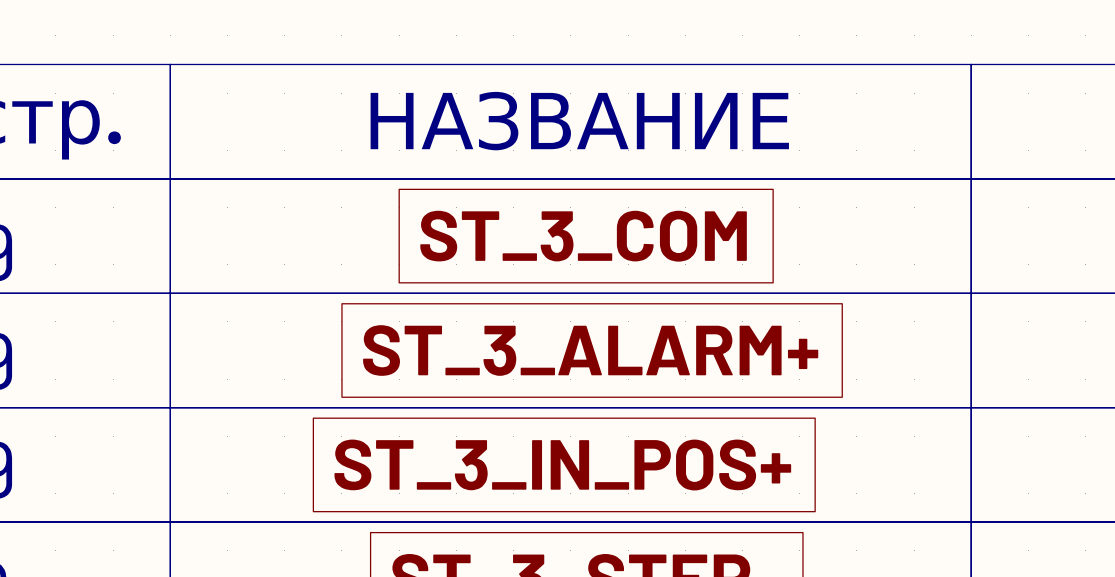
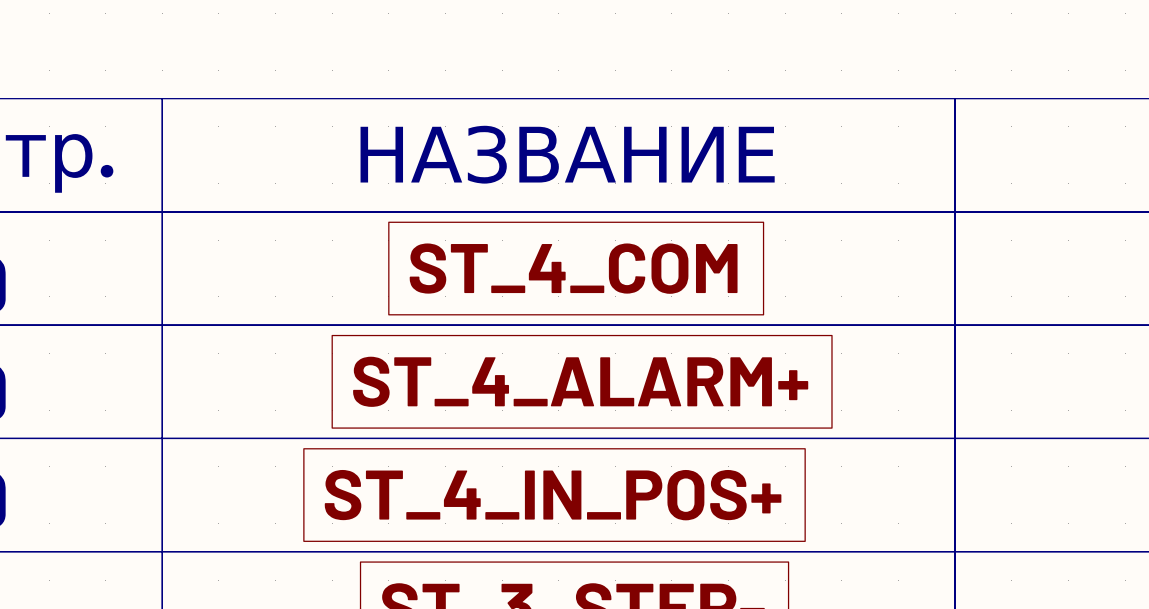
global label: ST_3_COM (583, 236) -> ST_4_COM (573, 268)
global label: ST_3_ALARM+ (590, 350) -> ST_4_ALARM+ (580, 381)
global label: ST_3_IN_POS+ (562, 465) -> ST_4_IN_POS+ (553, 495)

